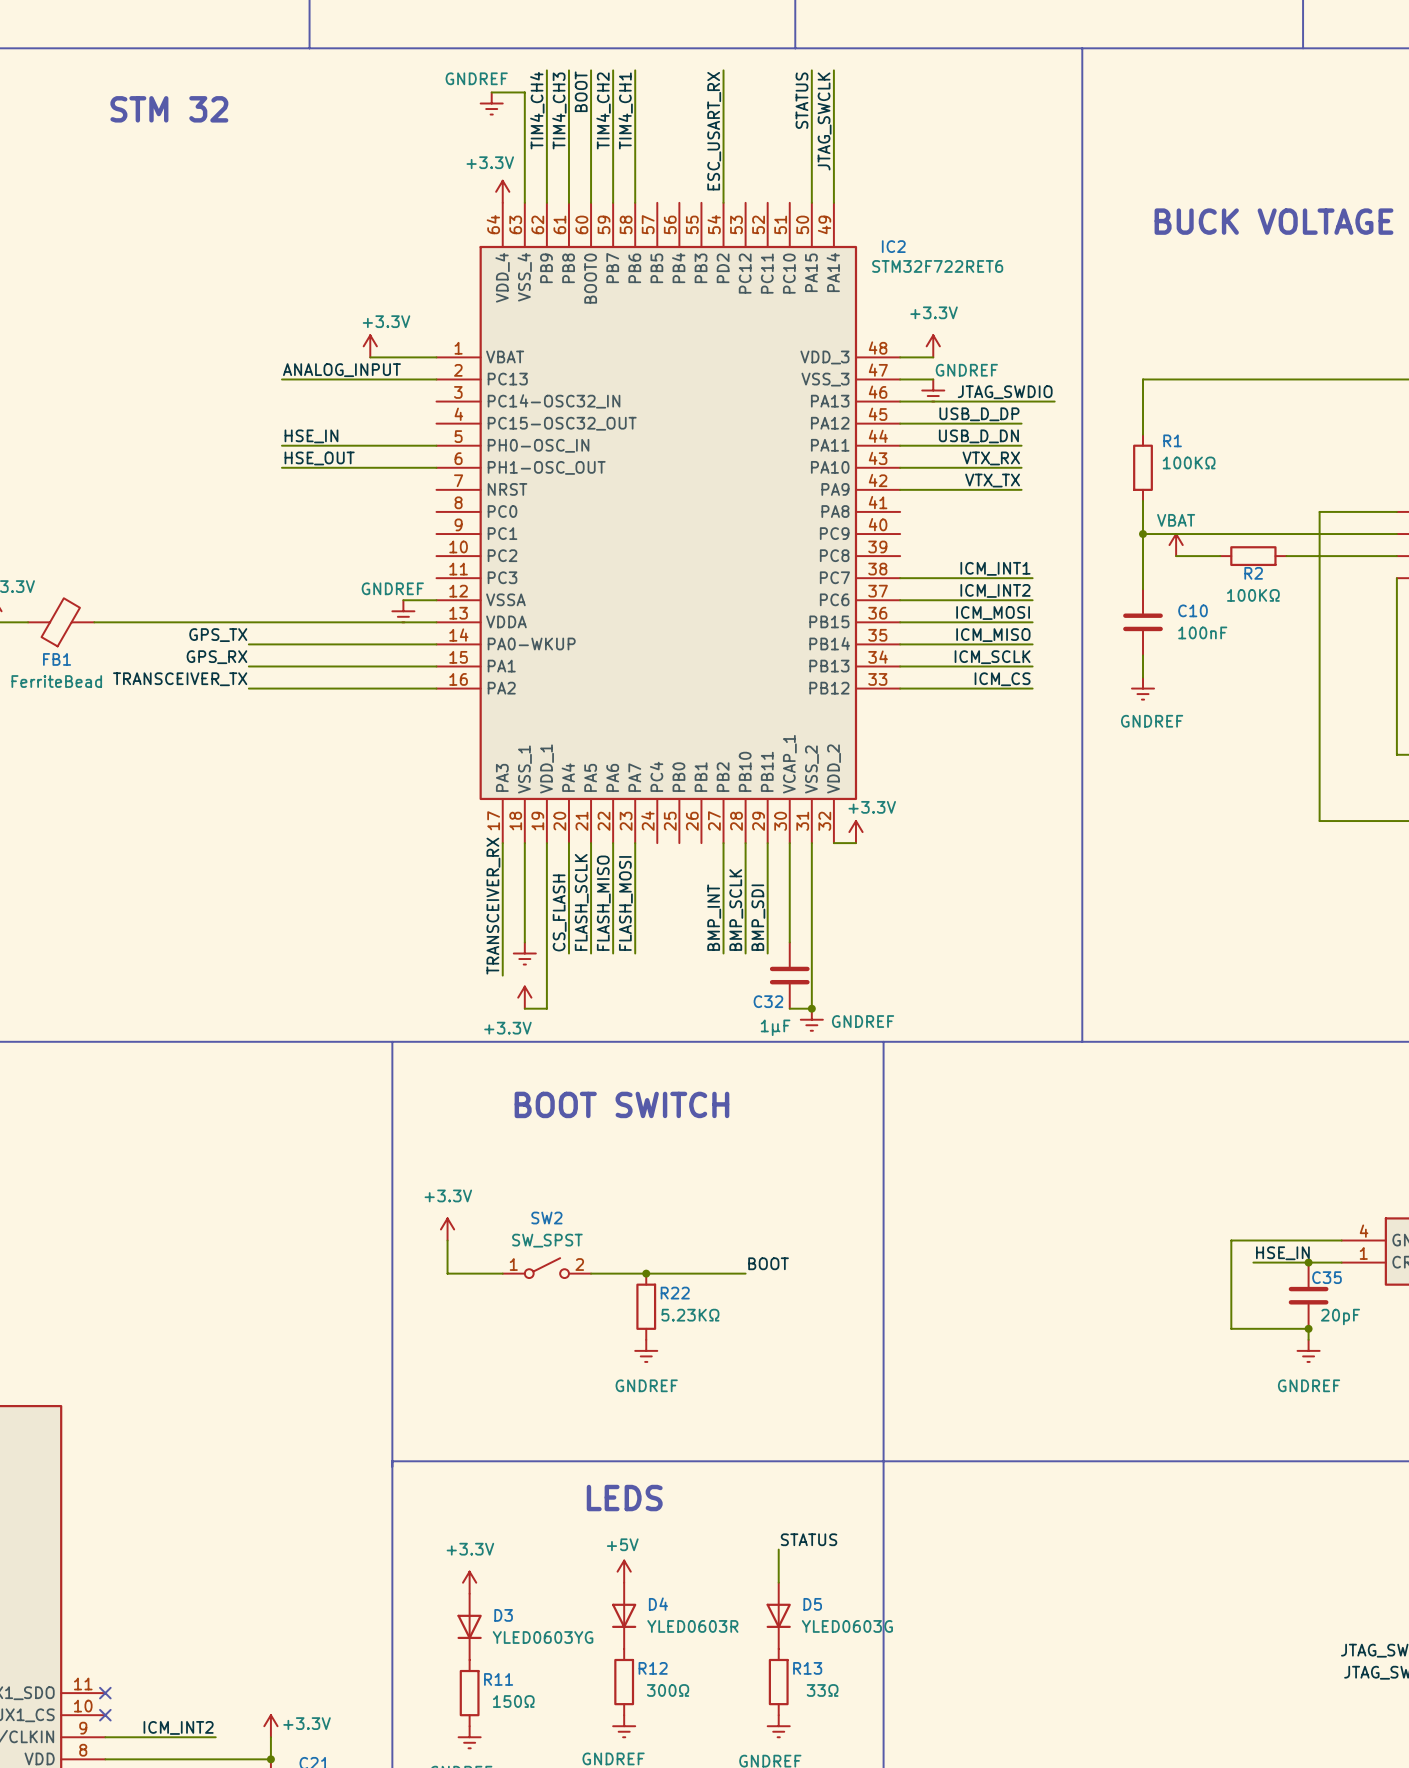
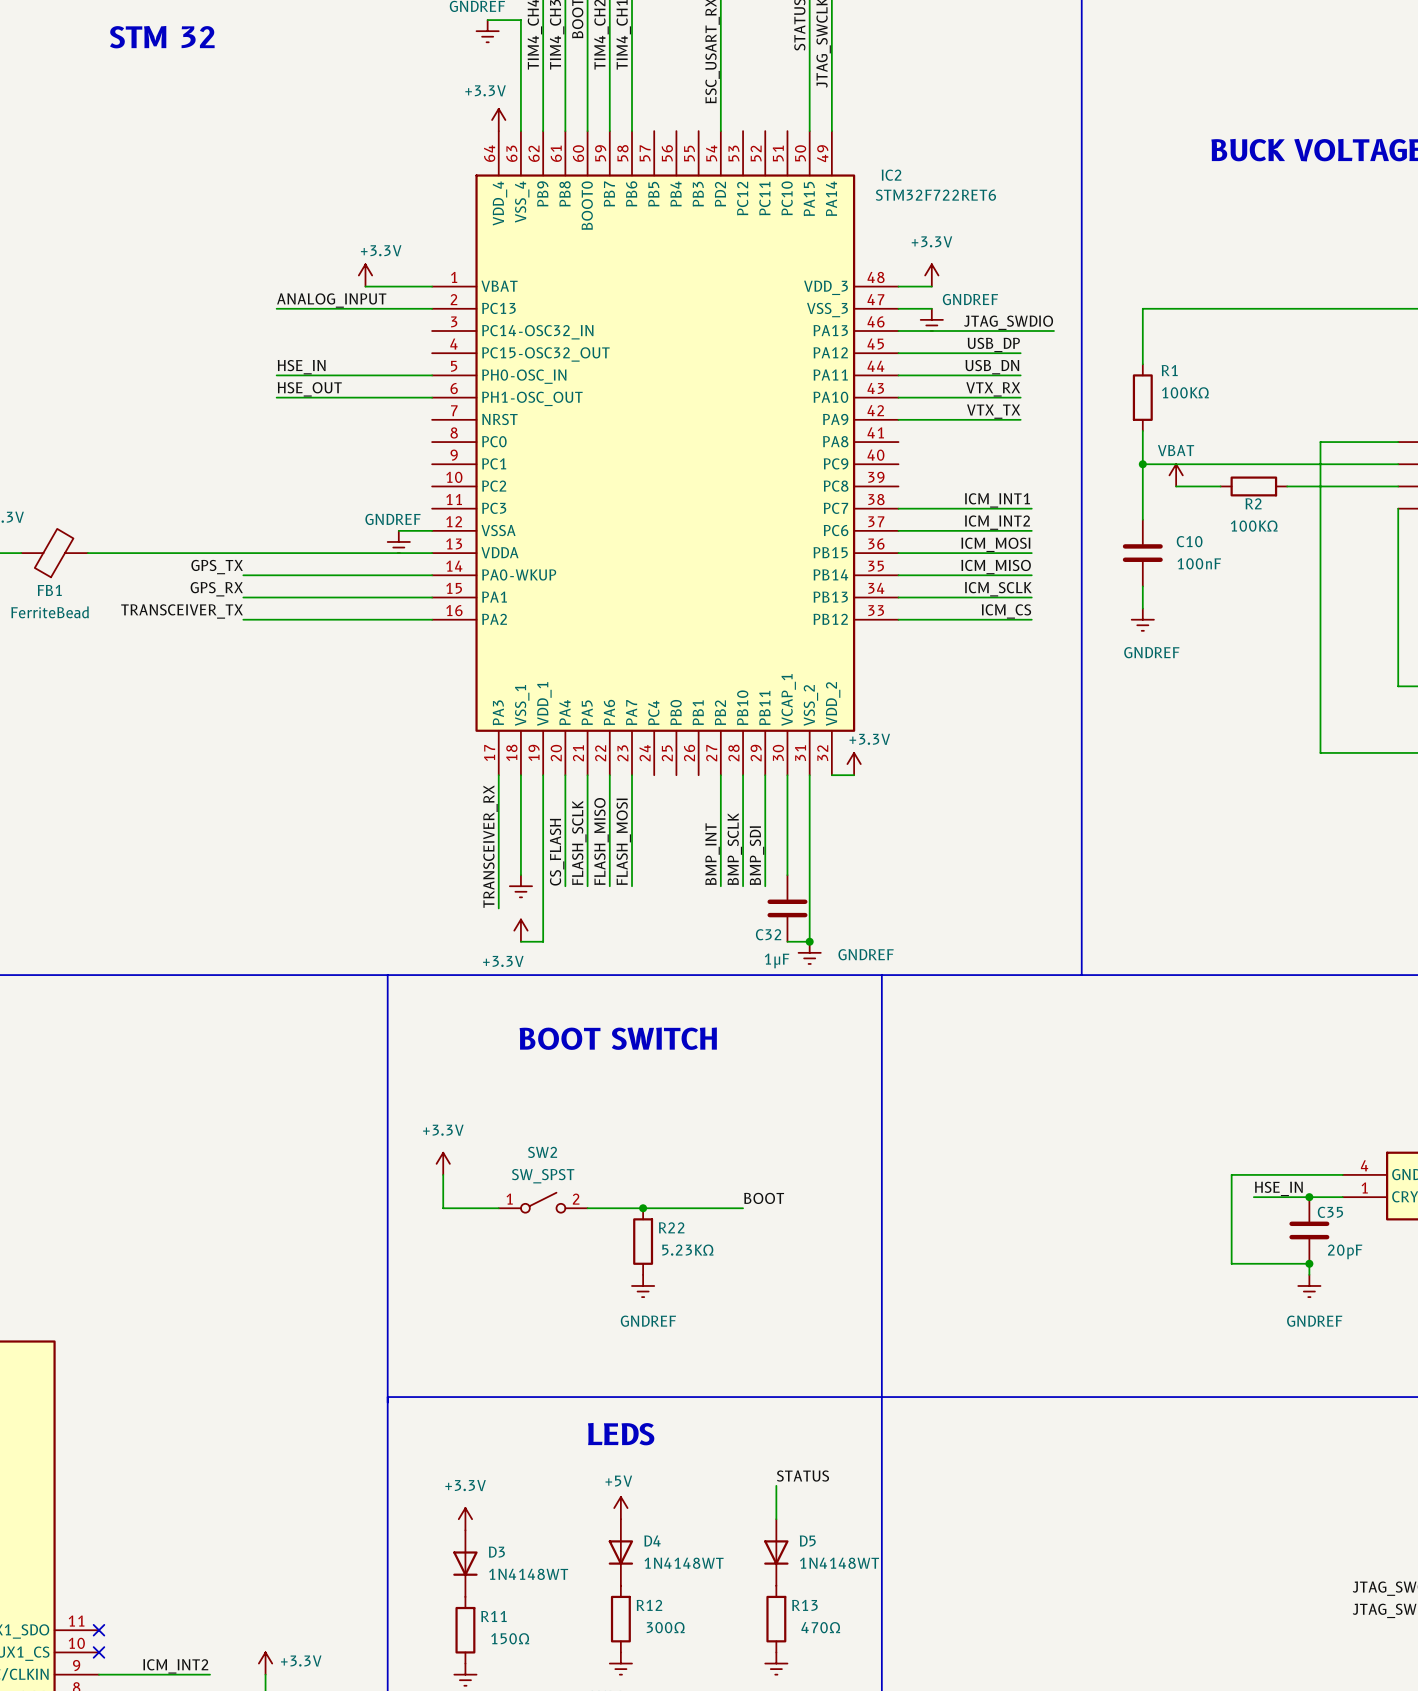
label: USB_D_DP (979, 414) -> USB_DP (993, 344)
label: USB_D_DN (978, 436) -> USB_DN (992, 367)
D4 value: YLED0603R (692, 1626) -> 1N4148WT (684, 1563)
D5 value: YLED0603G (847, 1626) -> 1N4148WT (839, 1563)
D3 value: YLED0603YG (543, 1637) -> 1N4148WT (528, 1574)
R13 value: 33Ω (822, 1690) -> 470Ω (820, 1627)

